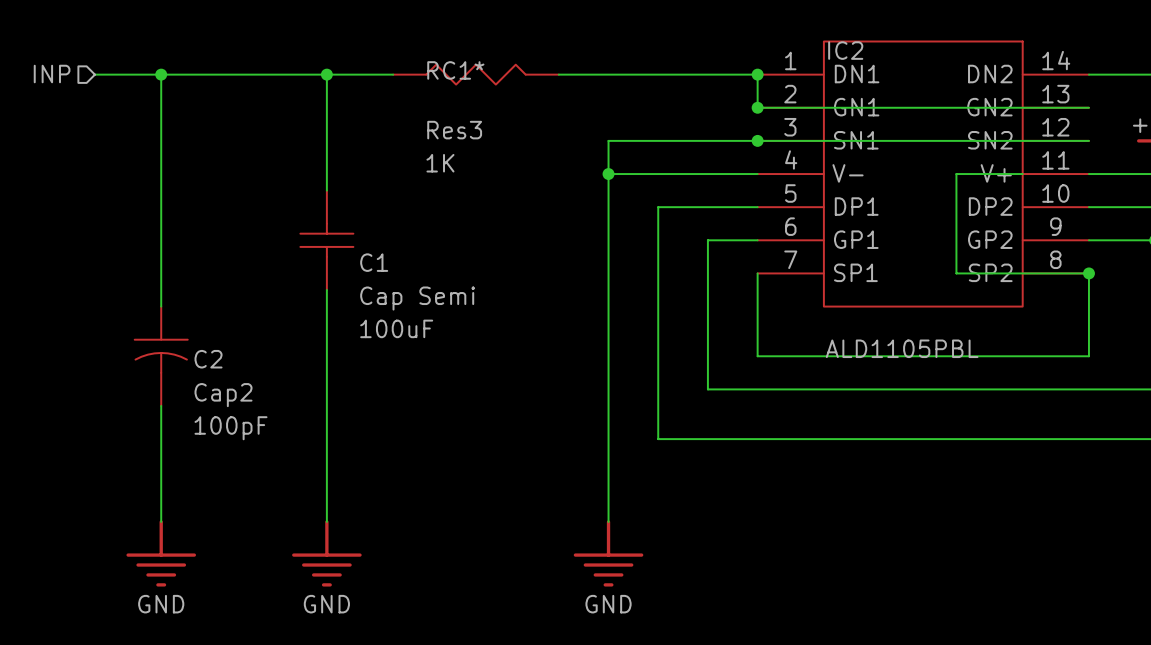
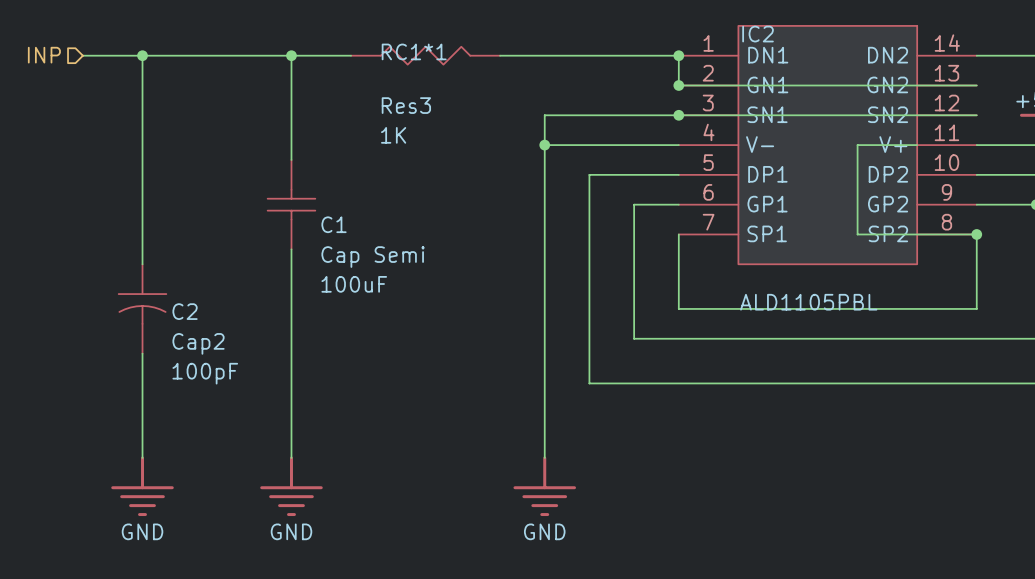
RC1* name: RC1* (455, 70) -> RC1*1 (414, 51)

